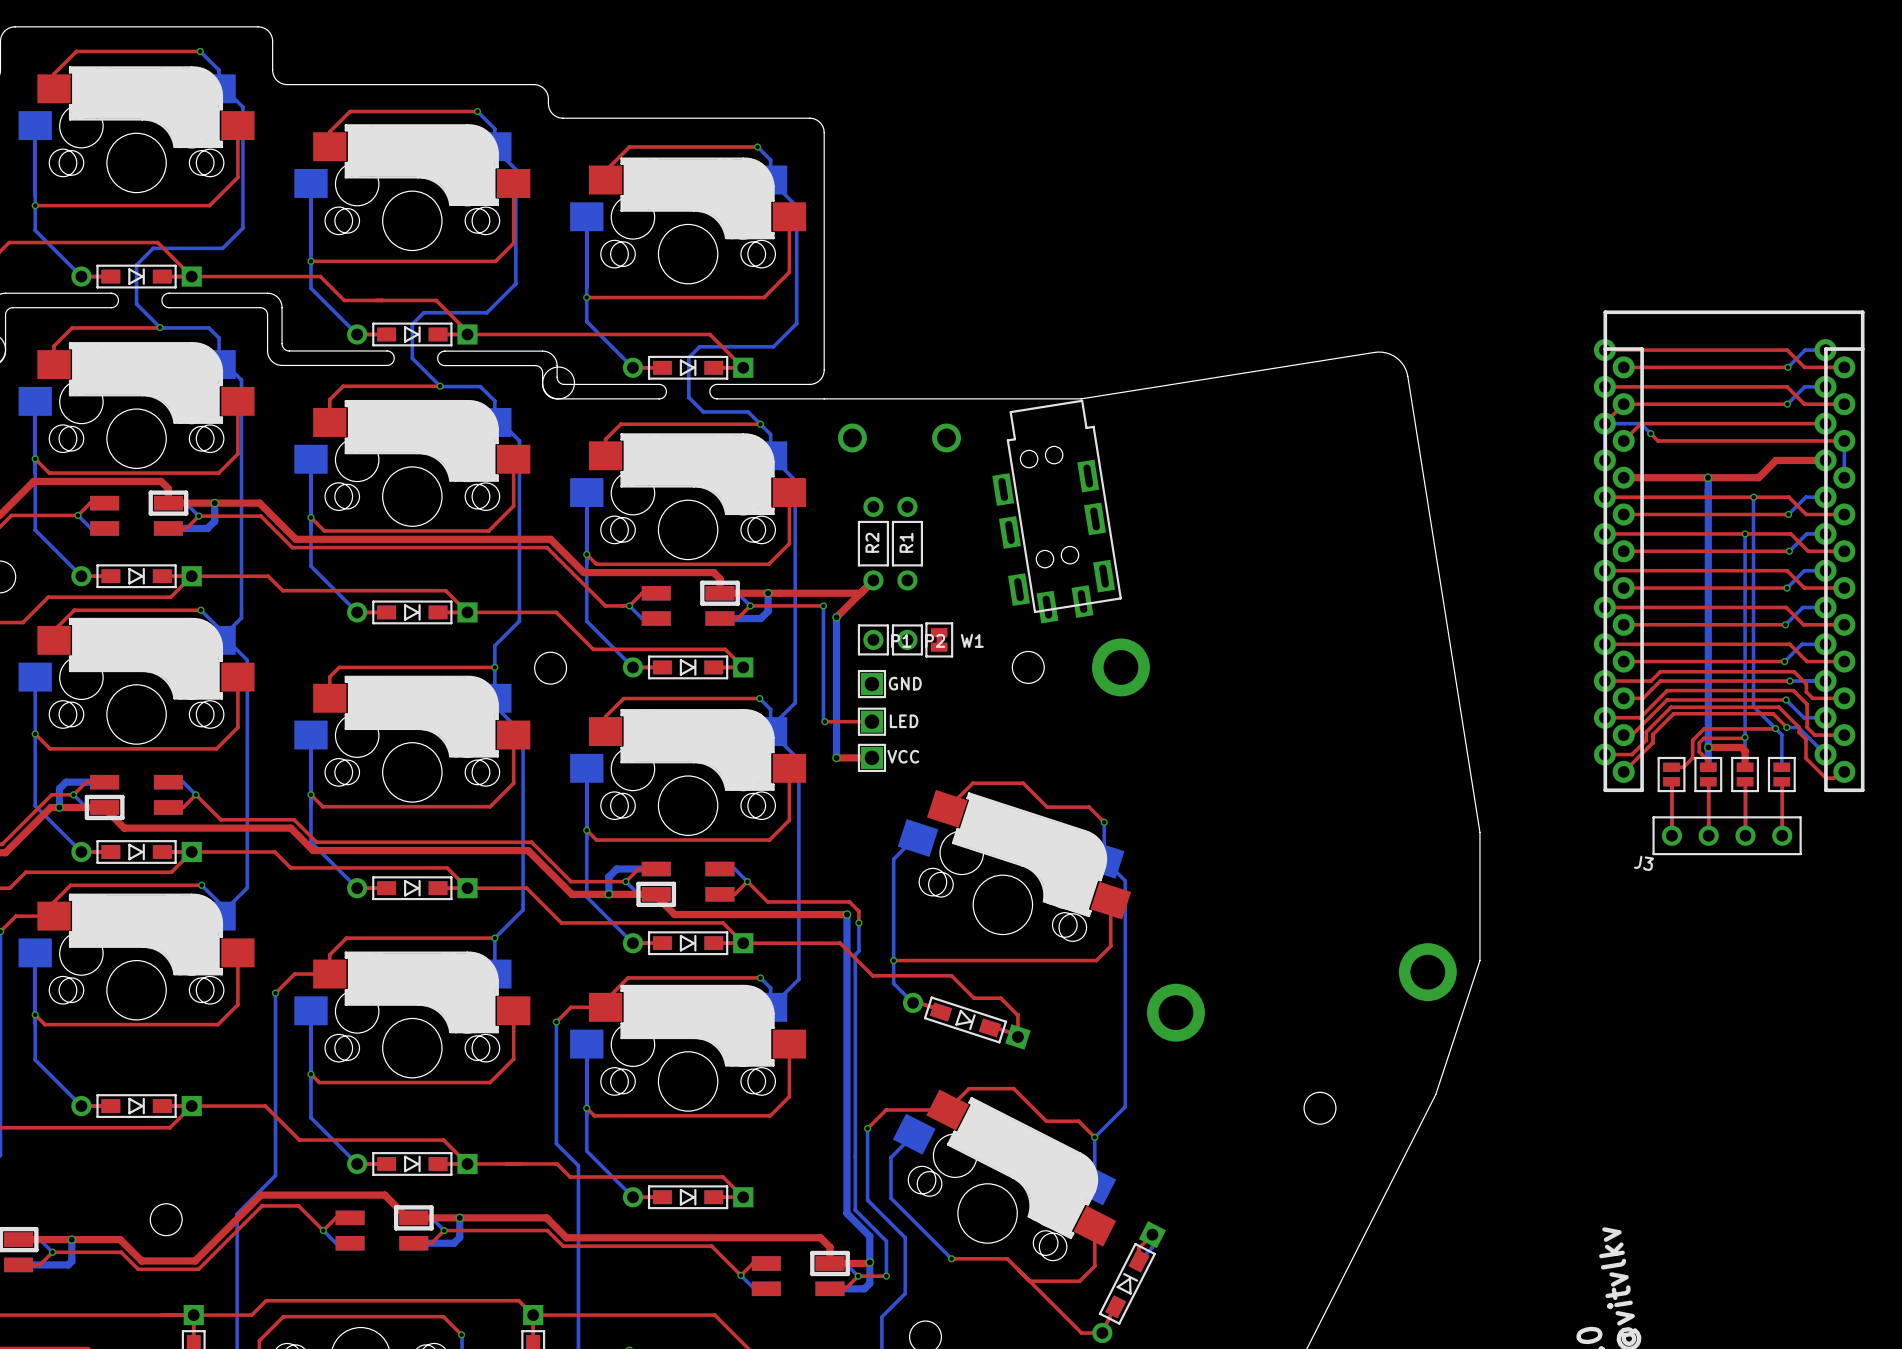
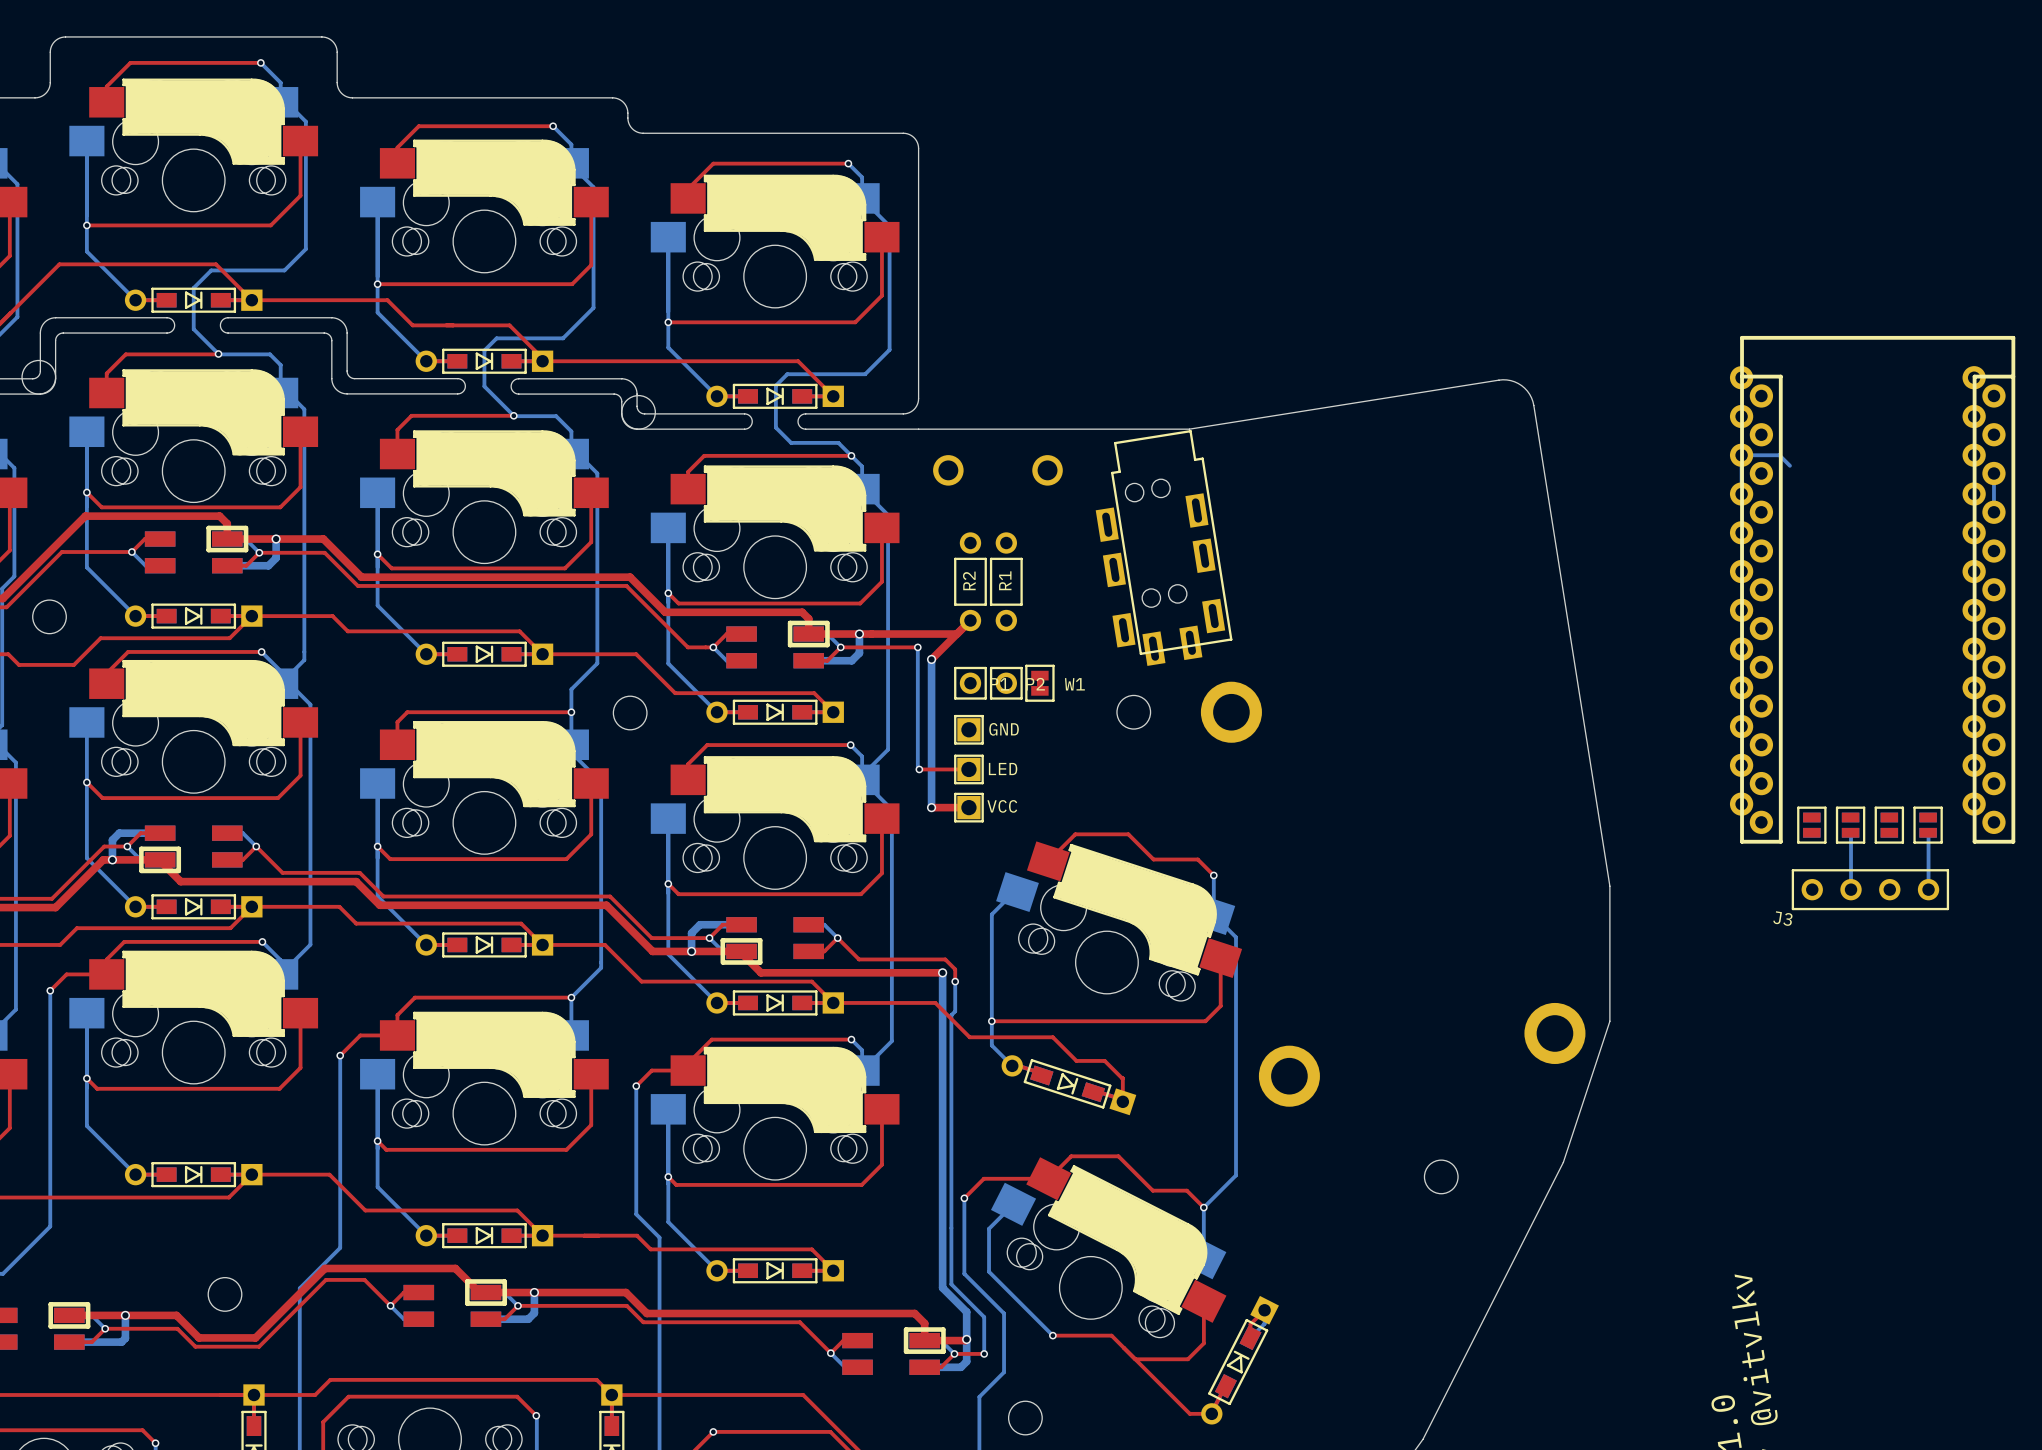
top track: (1604, 350) (1787, 350) (1804, 367) (1844, 367) -> none
bottom track: (1825, 350) (1805, 350) (1787, 367) -> none
top track: (1623, 367) (1787, 367) -> none
via: (1787, 367) -> none
top track: (1604, 386) (1787, 386) (1804, 404) (1844, 404) -> none
bottom track: (1825, 386) (1804, 386) (1787, 404) -> none
top track: (1787, 404) (1623, 404) (1604, 423) -> none
via: (1787, 404) -> none
top track: (1825, 423) (1641, 423) (1623, 440) -> none
top track: (1650, 433) (1658, 440) (1844, 440) -> none
via: (1650, 433) -> none
top track: (1825, 460) (1776, 460) (1758, 477) (1623, 477) -> none
bottom track: (1708, 477) (1708, 767) -> none
via: (1708, 477) -> none
top track: (1604, 497) (1788, 497) (1806, 514) (1844, 514) -> none
bottom track: (1753, 497) (1753, 706) (1781, 734) (1781, 767) -> none
via: (1753, 497) -> none
bottom track: (1825, 497) (1805, 497) (1788, 514) -> none
top track: (1623, 514) (1788, 514) -> none
via: (1788, 514) -> none
top track: (1604, 533) (1790, 533) (1808, 551) (1844, 551) -> none
via: (1745, 533) -> none
bottom track: (1825, 533) (1806, 533) (1789, 551) -> none
bottom track: (1745, 534) (1745, 767) -> none
top track: (1623, 551) (1789, 551) -> none
via: (1789, 551) -> none
top track: (1604, 570) (1787, 570) (1804, 588) (1844, 588) -> none
bottom track: (1825, 570) (1804, 570) (1787, 588) -> none
top track: (1623, 588) (1787, 588) -> none
via: (1787, 588) -> none
top track: (1604, 607) (1786, 607) (1803, 624) (1844, 624) -> none
bottom track: (1825, 607) (1802, 607) (1785, 624) -> none
top track: (1623, 624) (1785, 624) -> none
via: (1785, 624) -> none
top track: (1604, 644) (1789, 644) (1807, 661) (1844, 661) -> none
bottom track: (1825, 644) (1801, 644) (1784, 661) -> none
top track: (1623, 661) (1784, 661) -> none
via: (1784, 661) -> none
top track: (1604, 681) (1651, 681) (1660, 671) (1794, 671) (1806, 684) (1806, 692) (1812, 698) (1844, 698) -> none
top track: (1789, 681) (1660, 681) (1643, 698) (1623, 698) -> none
bottom track: (1789, 681) (1825, 681) -> none
via: (1789, 681) -> none
top track: (1786, 700) (1667, 700) (1631, 735) (1623, 735) -> none
bottom track: (1786, 700) (1803, 717) (1825, 717) -> none
via: (1786, 700) -> none
top track: (1604, 717) (1640, 717) (1667, 690) (1793, 690) (1807, 704) (1807, 727) (1814, 735) (1844, 735) -> none
top track: (1786, 727) (1773, 713) (1673, 713) (1652, 734) (1652, 743) -> none
bottom track: (1786, 727) (1798, 727) (1825, 754) -> none
via: (1786, 727) -> none
top track: (1775, 728) (1704, 728) (1692, 740) (1692, 757) (1683, 767) (1671, 767) -> none
via: (1775, 728) -> none
top track: (1652, 734) (1652, 742) (1623, 771) -> none
top track: (1745, 737) (1703, 738) (1699, 743) (1699, 751) (1708, 760) (1708, 767) (1702, 767) -> none
via: (1745, 737) -> none
top track: (1708, 747) (1741, 747) (1745, 750) (1745, 767) -> none
via: (1708, 747) -> none
top track: (1604, 754) (1632, 754) (1646, 740) (1646, 732) (1671, 707) (1778, 707) (1799, 727) (1799, 732) (1805, 739) (1805, 758) (1825, 778) (1833, 778) (1840, 771) (1844, 771) -> none
top track: (1671, 781) (1671, 835) -> none
top track: (1708, 781) (1708, 835) -> none
top track: (1745, 781) (1745, 835) -> none
top track: (1781, 781) (1782, 835) -> none

